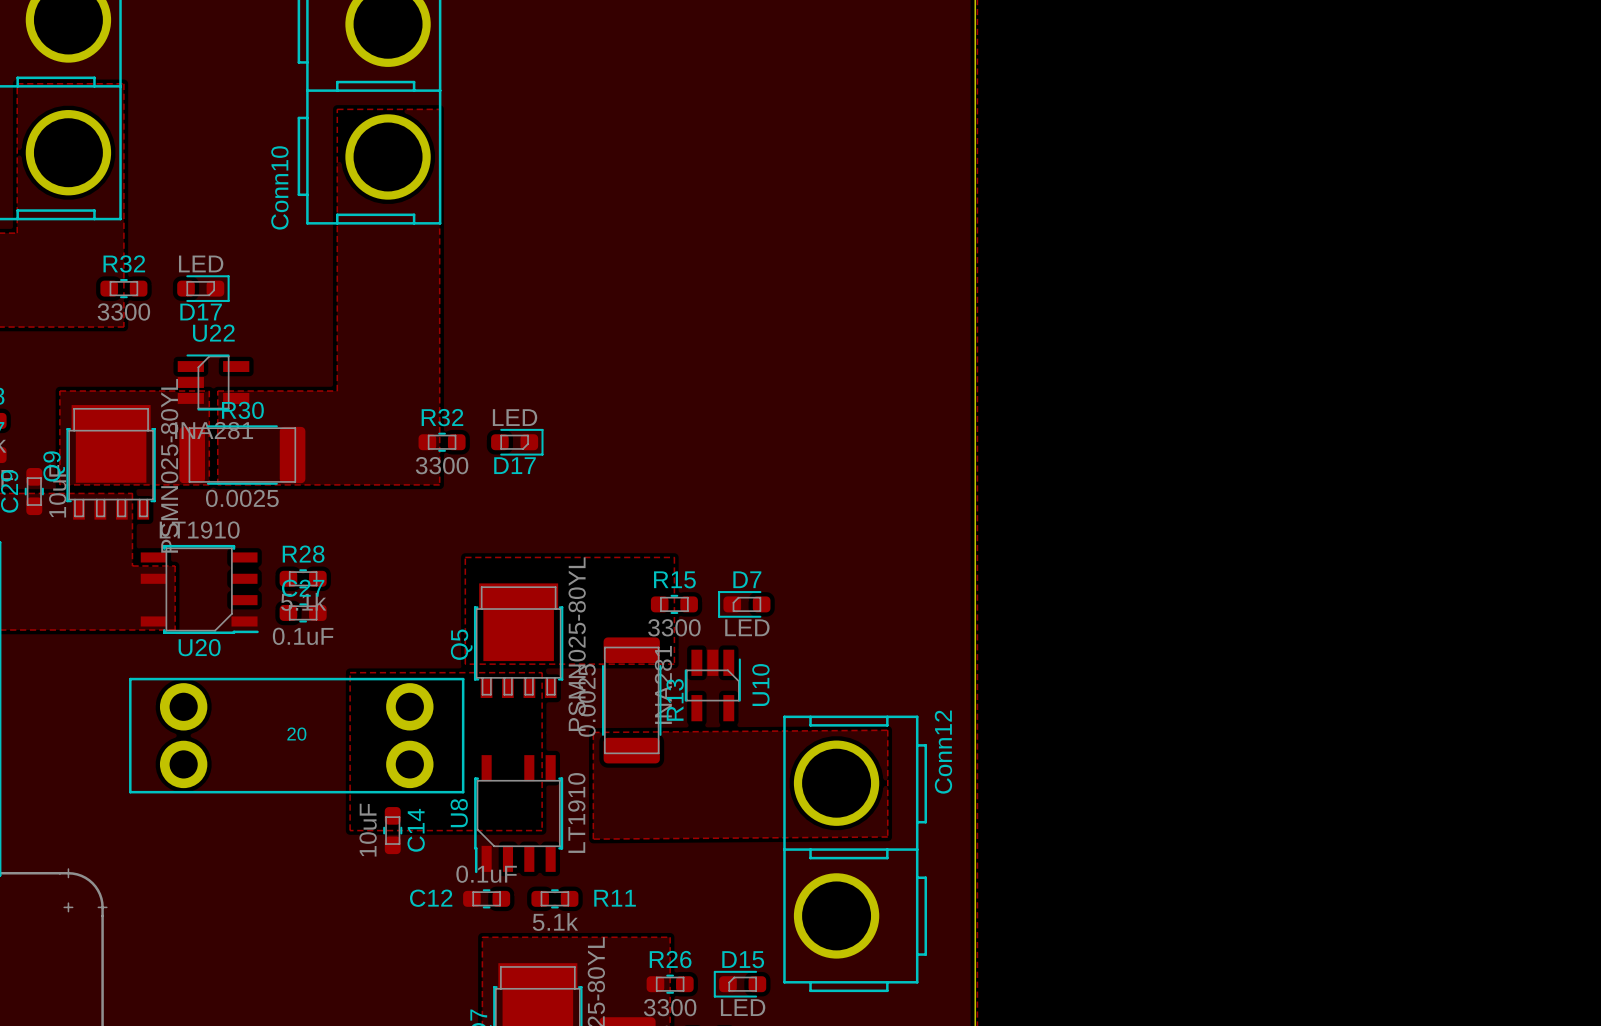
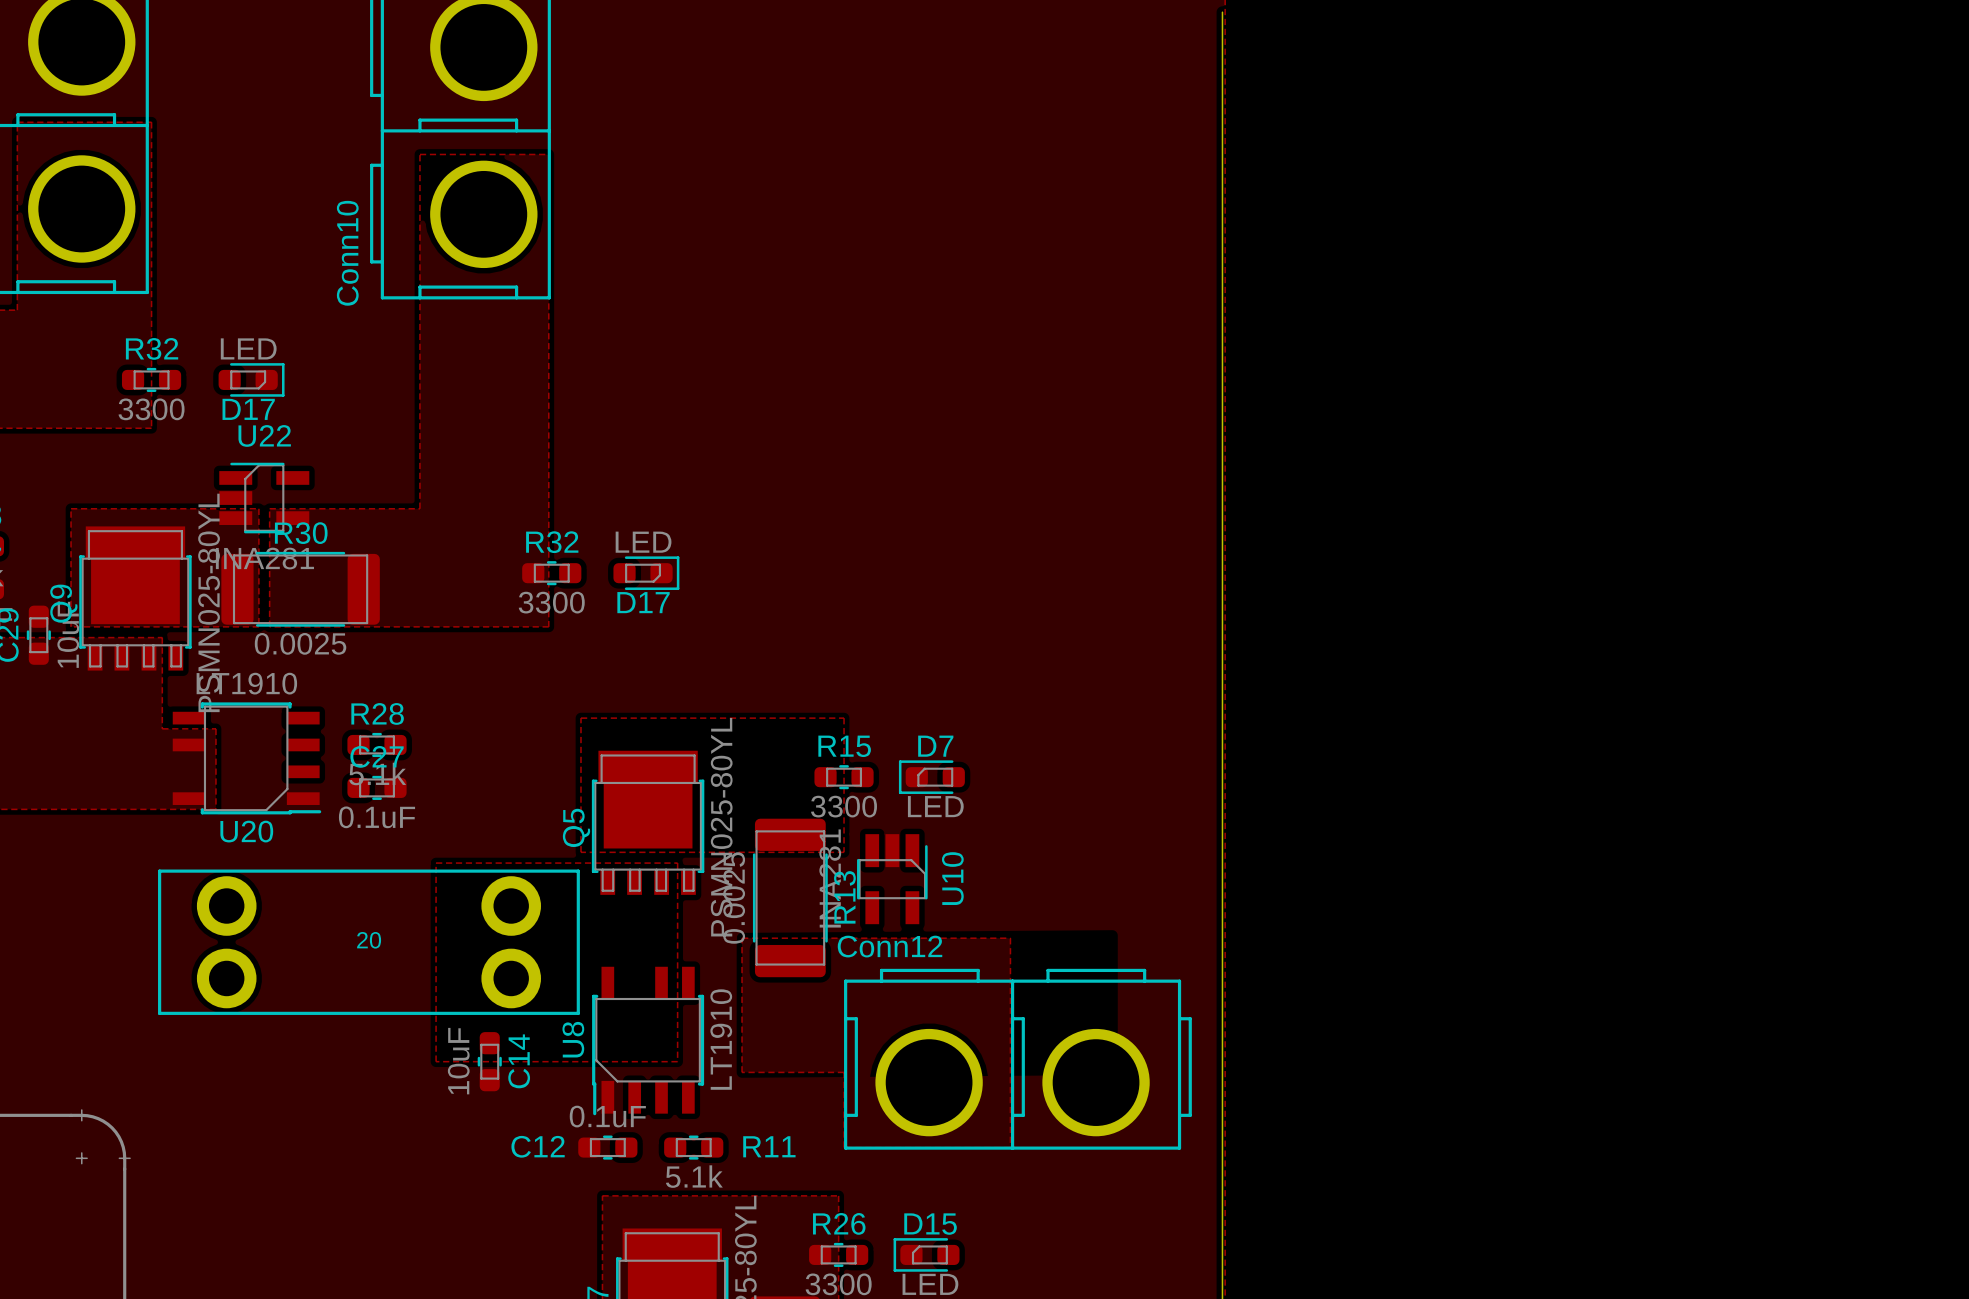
zone outline: (593, 732) (887, 730) (887, 836) (593, 839) -> (742, 938) (1010, 938) (1010, 1147) (844, 1147) (844, 1072) (742, 1072)
Conn12 rotation: 0° (855, 853) -> 90° counterclockwise (1017, 1059)

